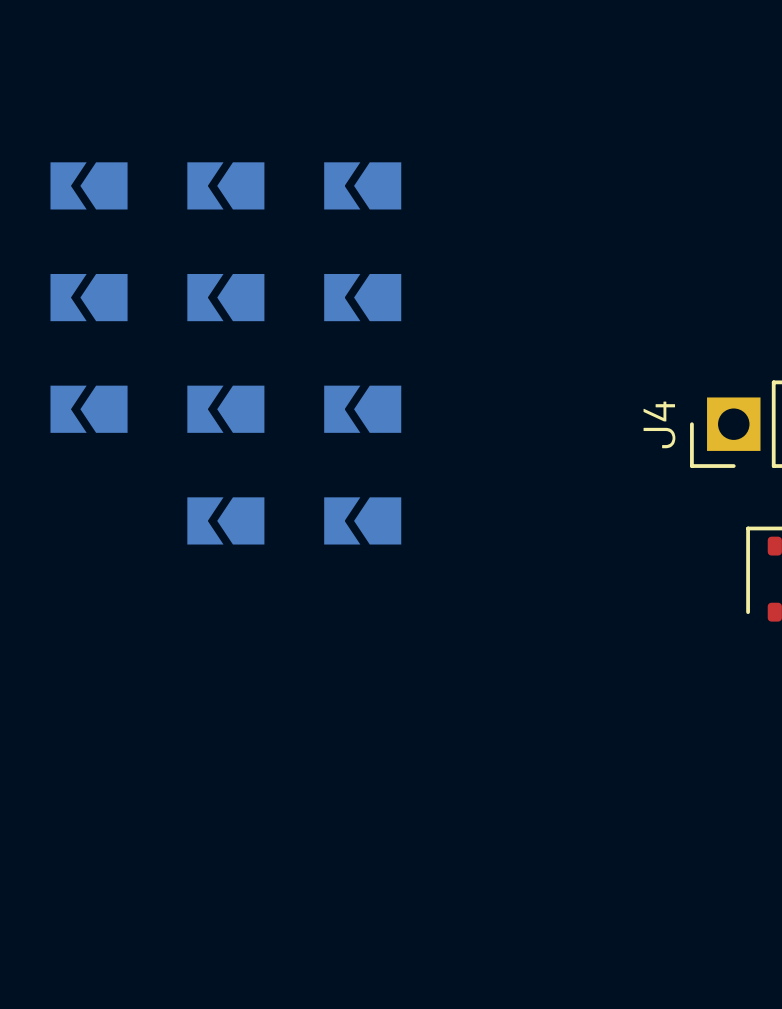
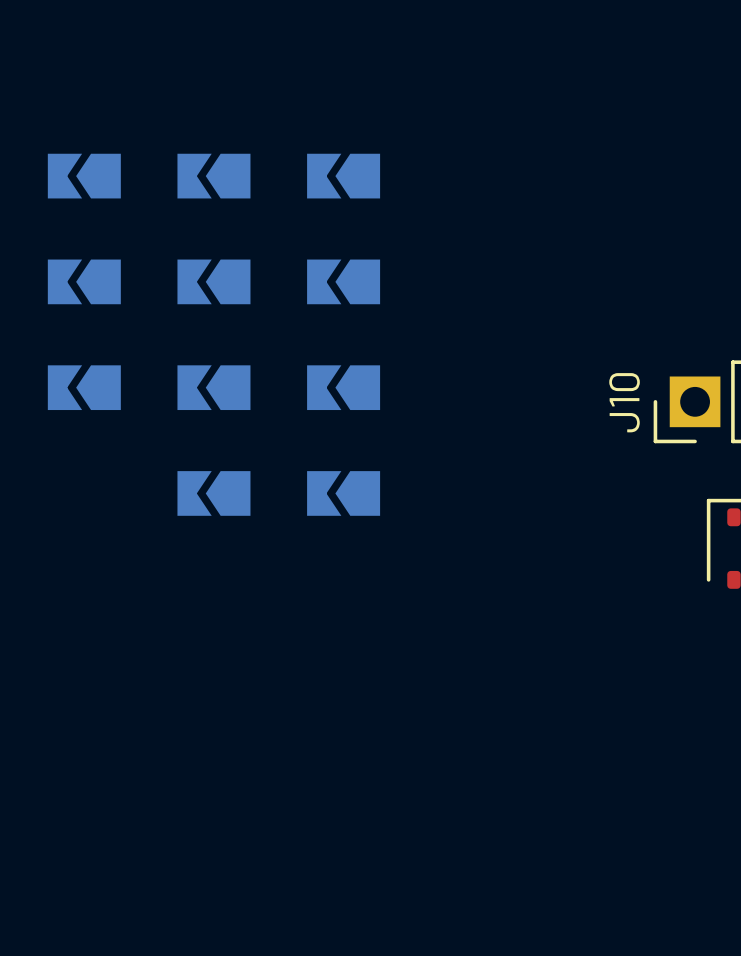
J4 name: J4 (659, 424) -> J10 (624, 402)

